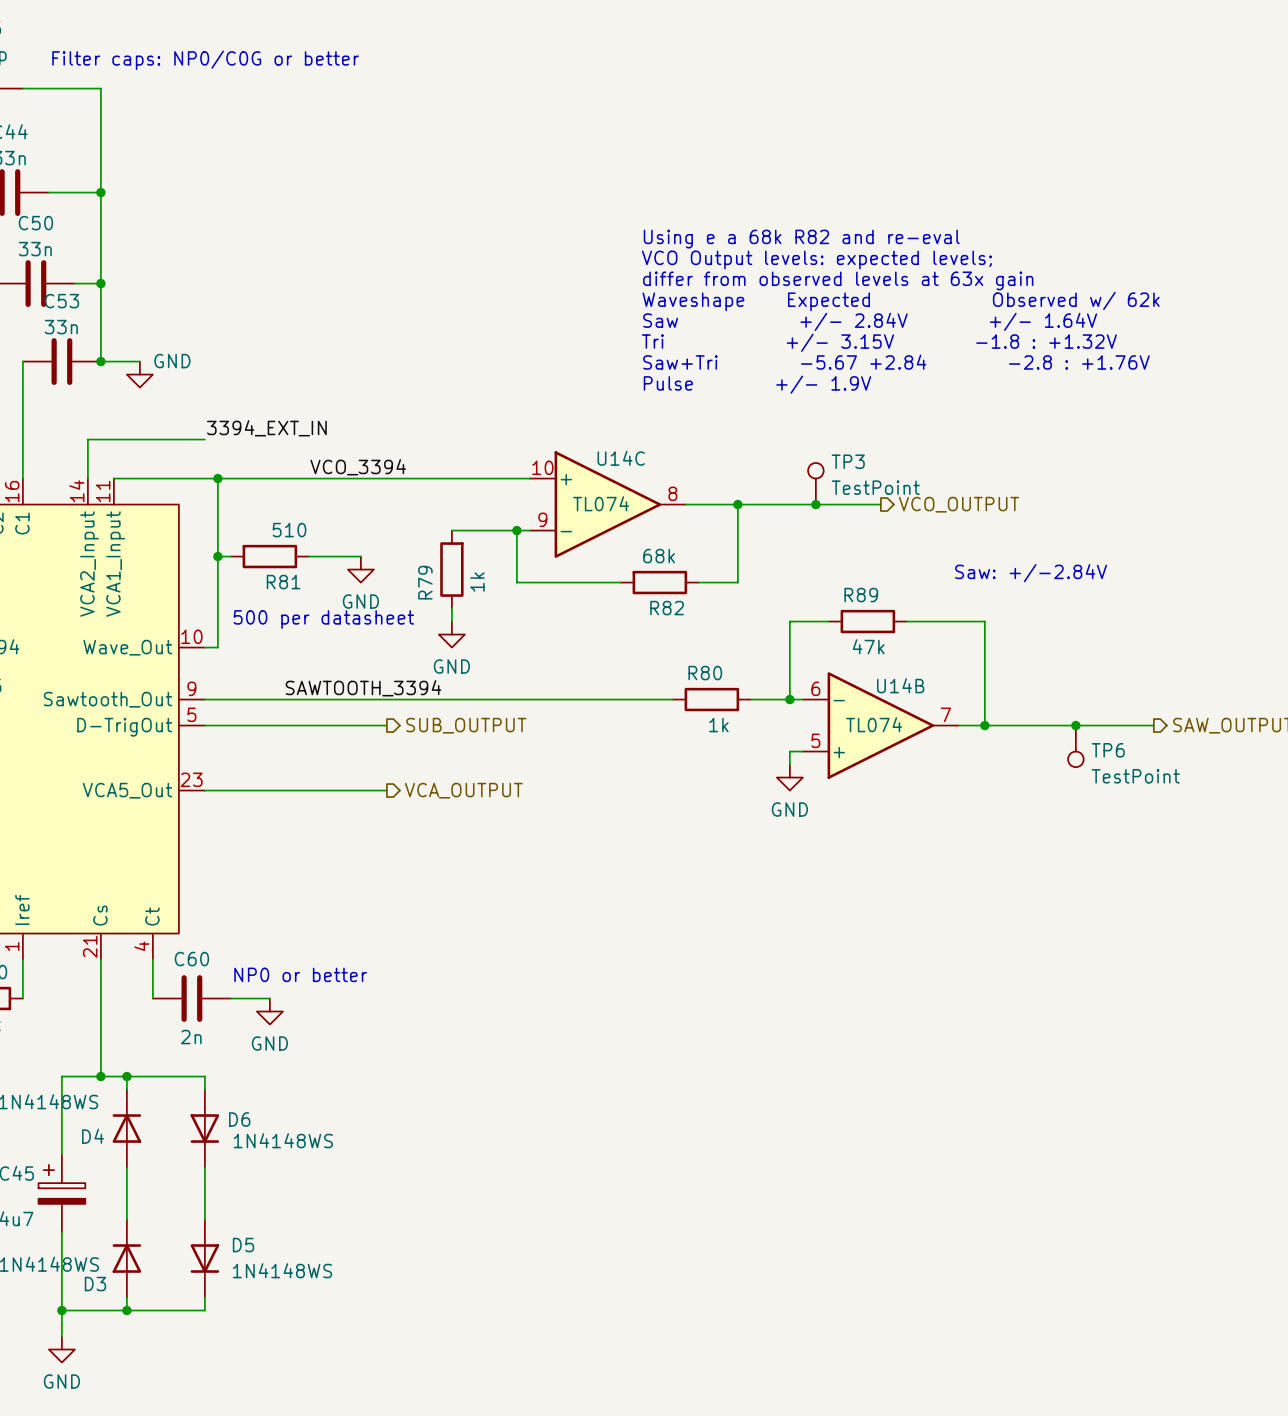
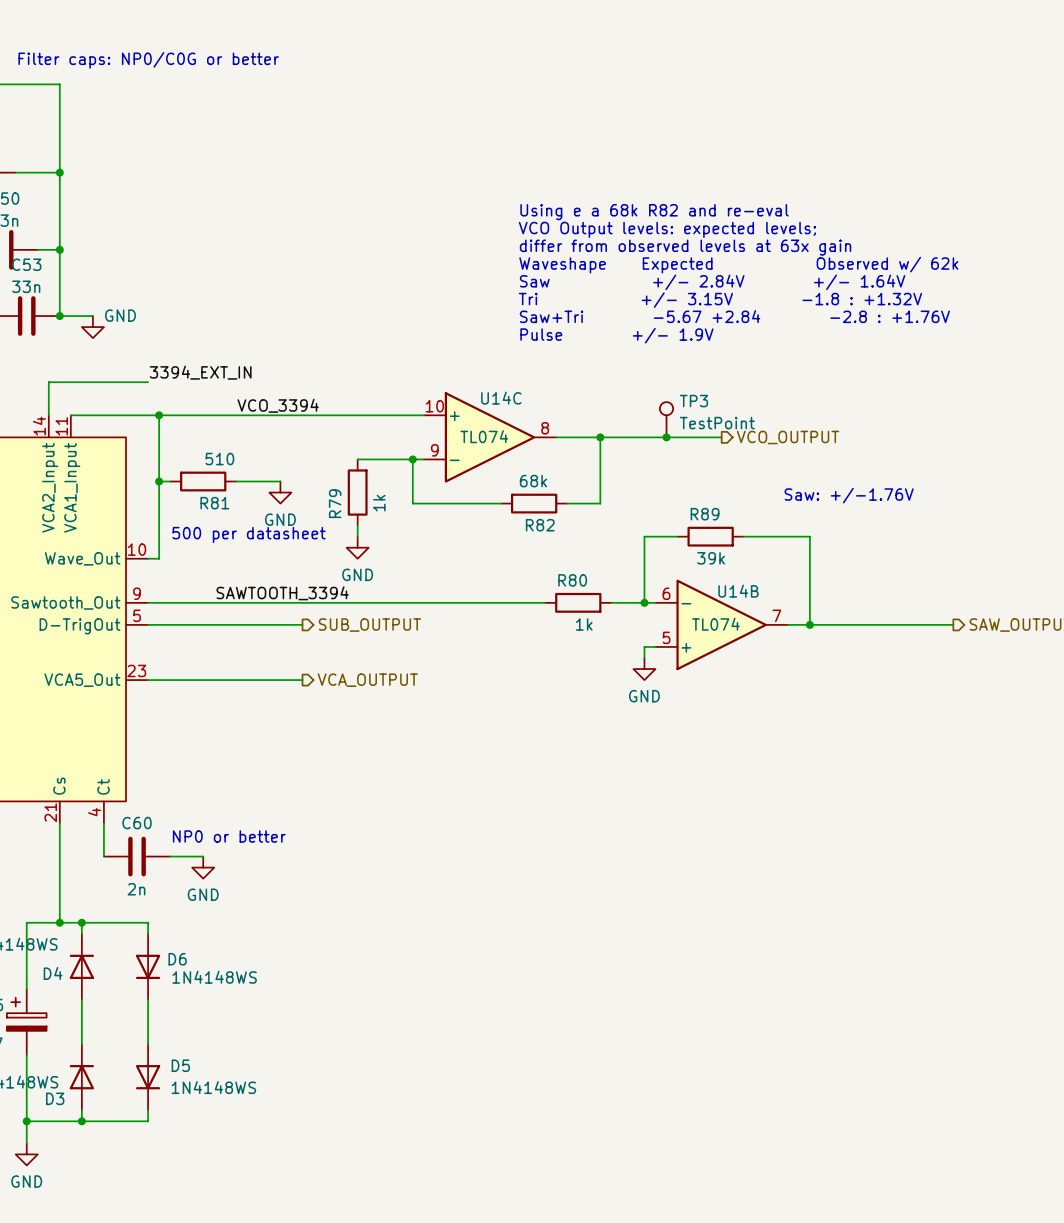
text: Saw: +/-2.84V (1031, 573) -> Saw: +/-1.76V (849, 495)
R89 value: 47k (868, 646) -> 39k (711, 558)
junction: (1075, 725) -> none
TP6: TestPoint (1075, 746) -> none

